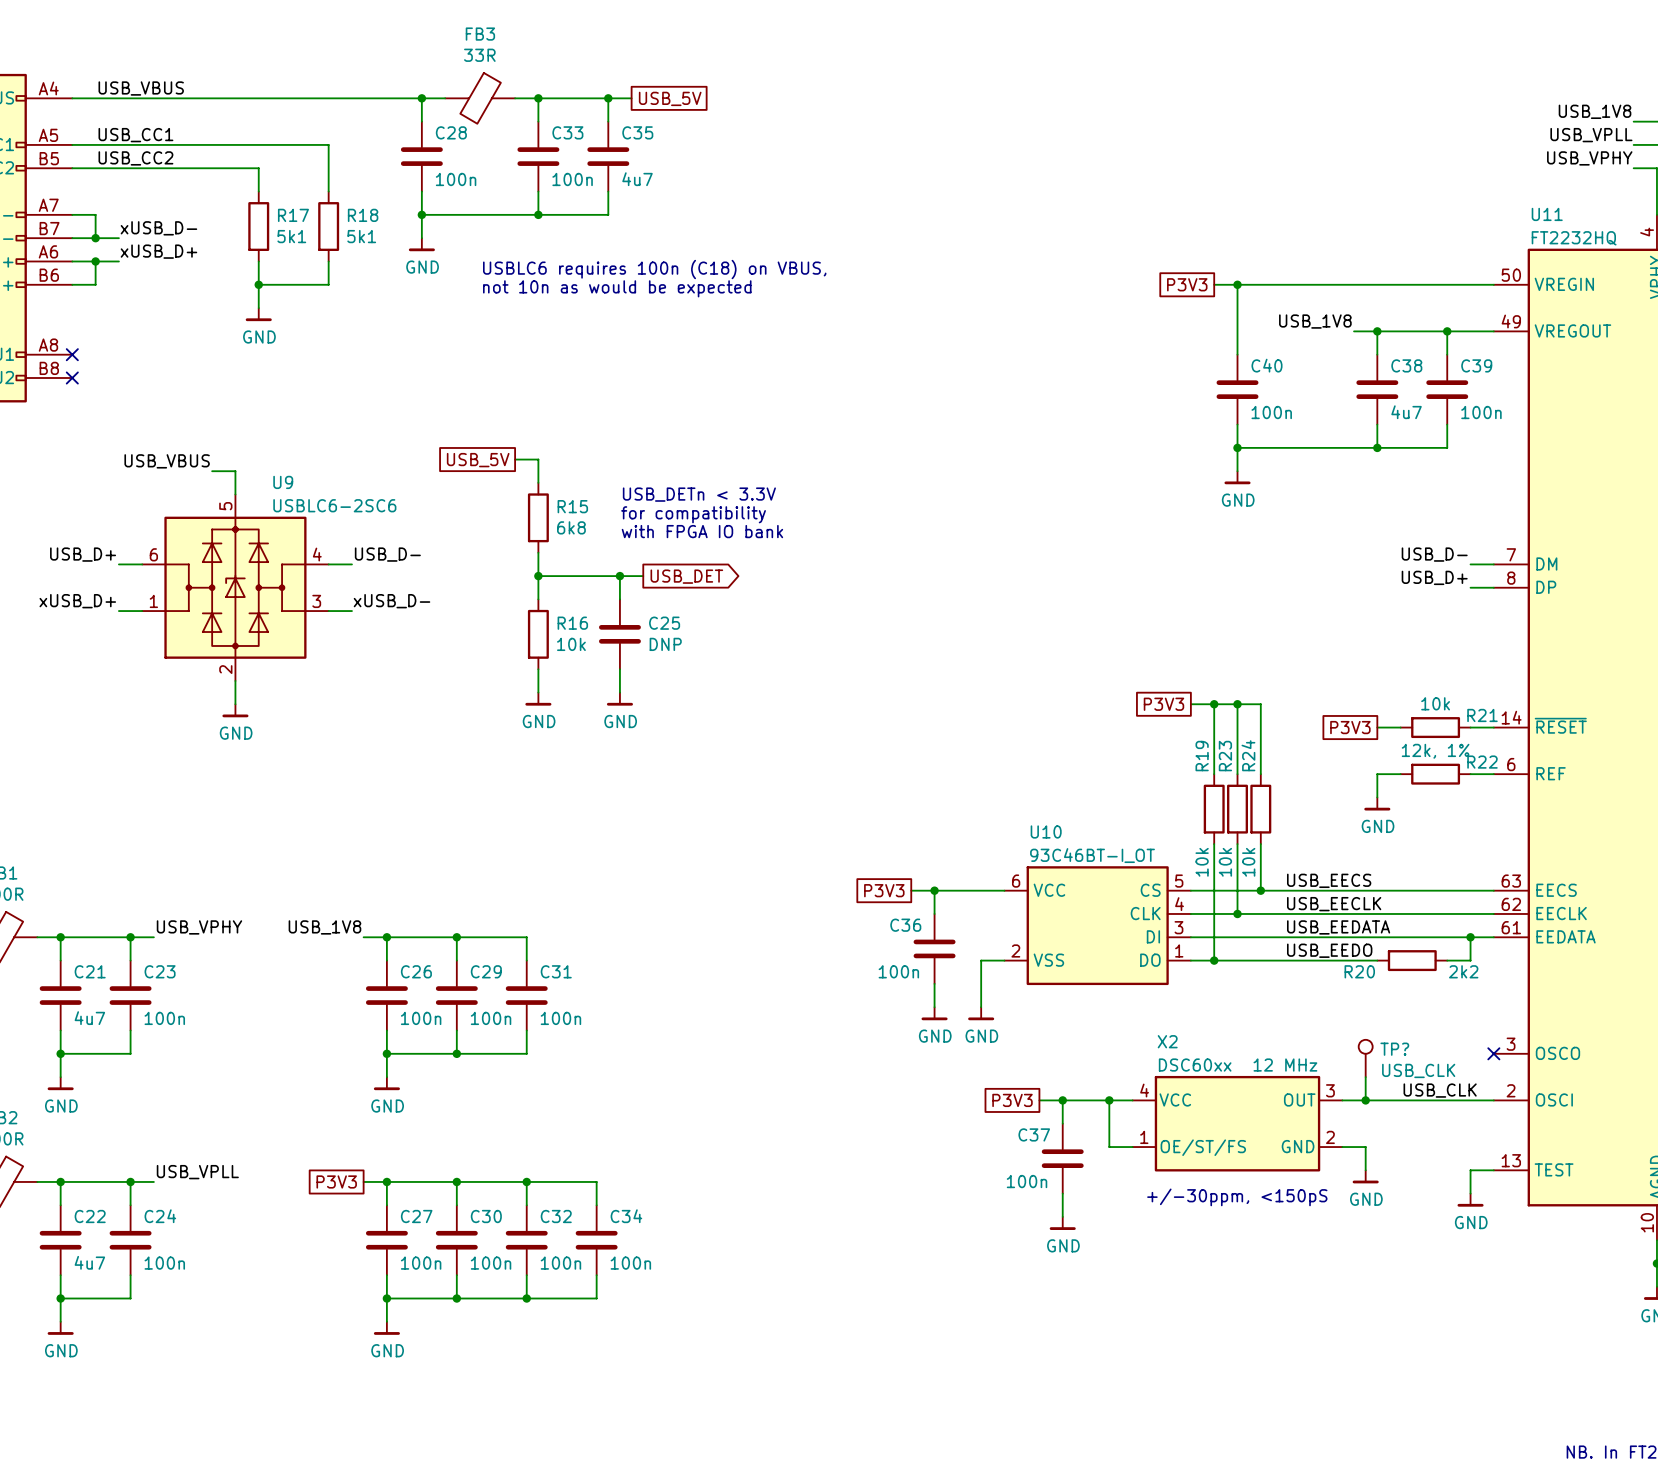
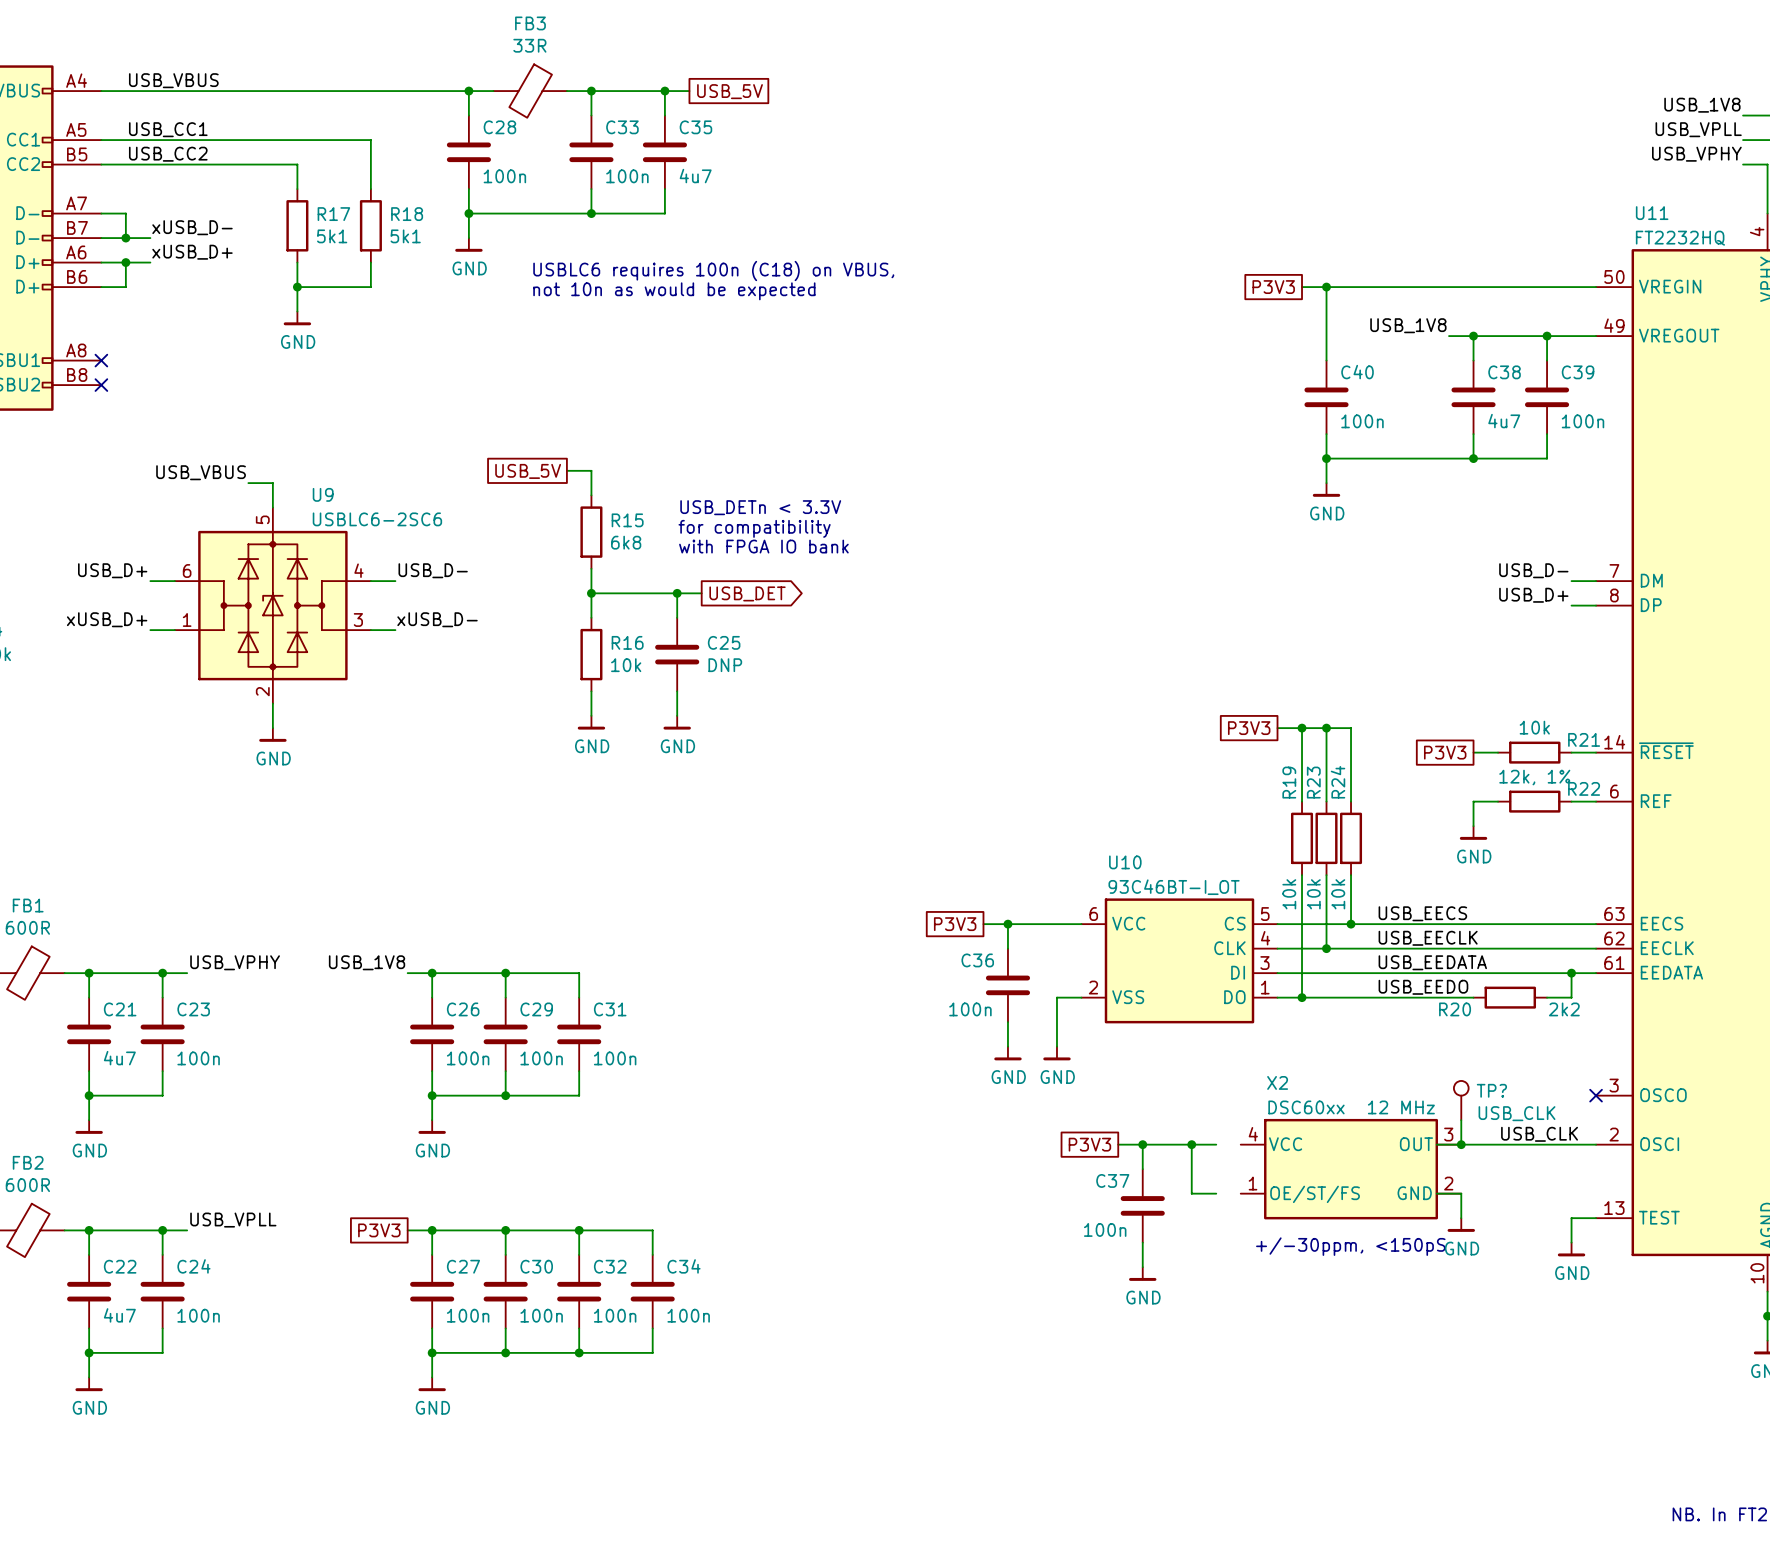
X2 position: (1237, 1123) -> (1351, 1169)
text position: +/-30ppm, <150pS (1237, 1197) -> +/-30ppm, <150pS (1350, 1246)

